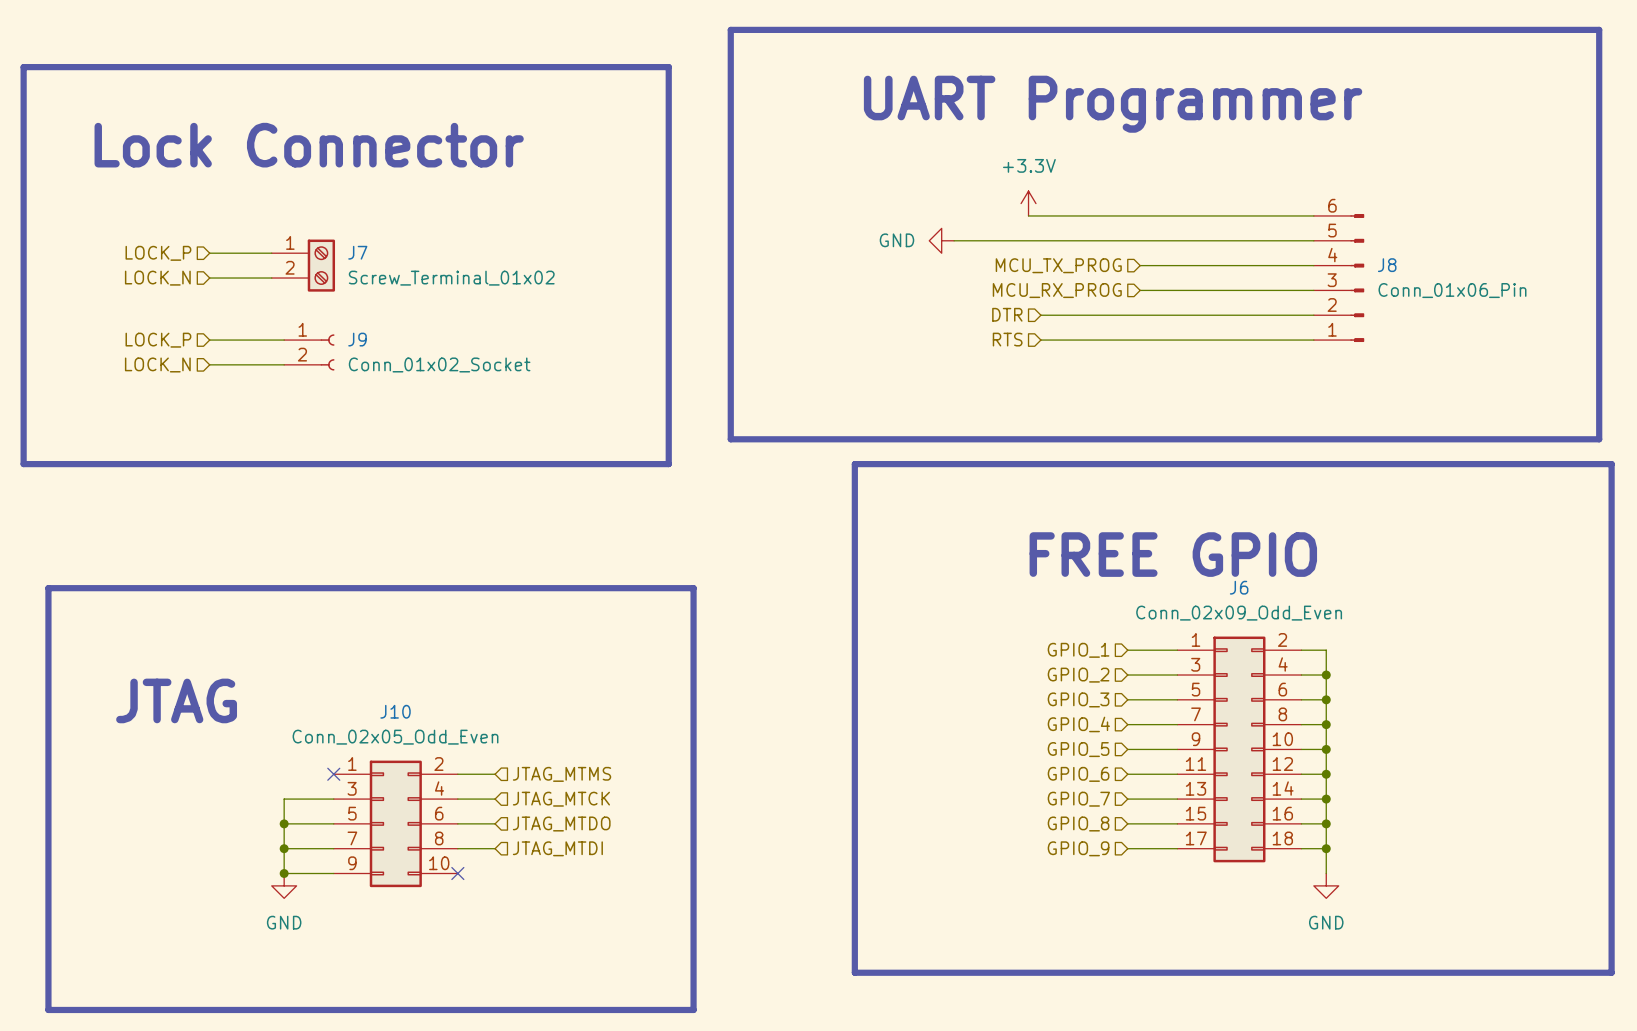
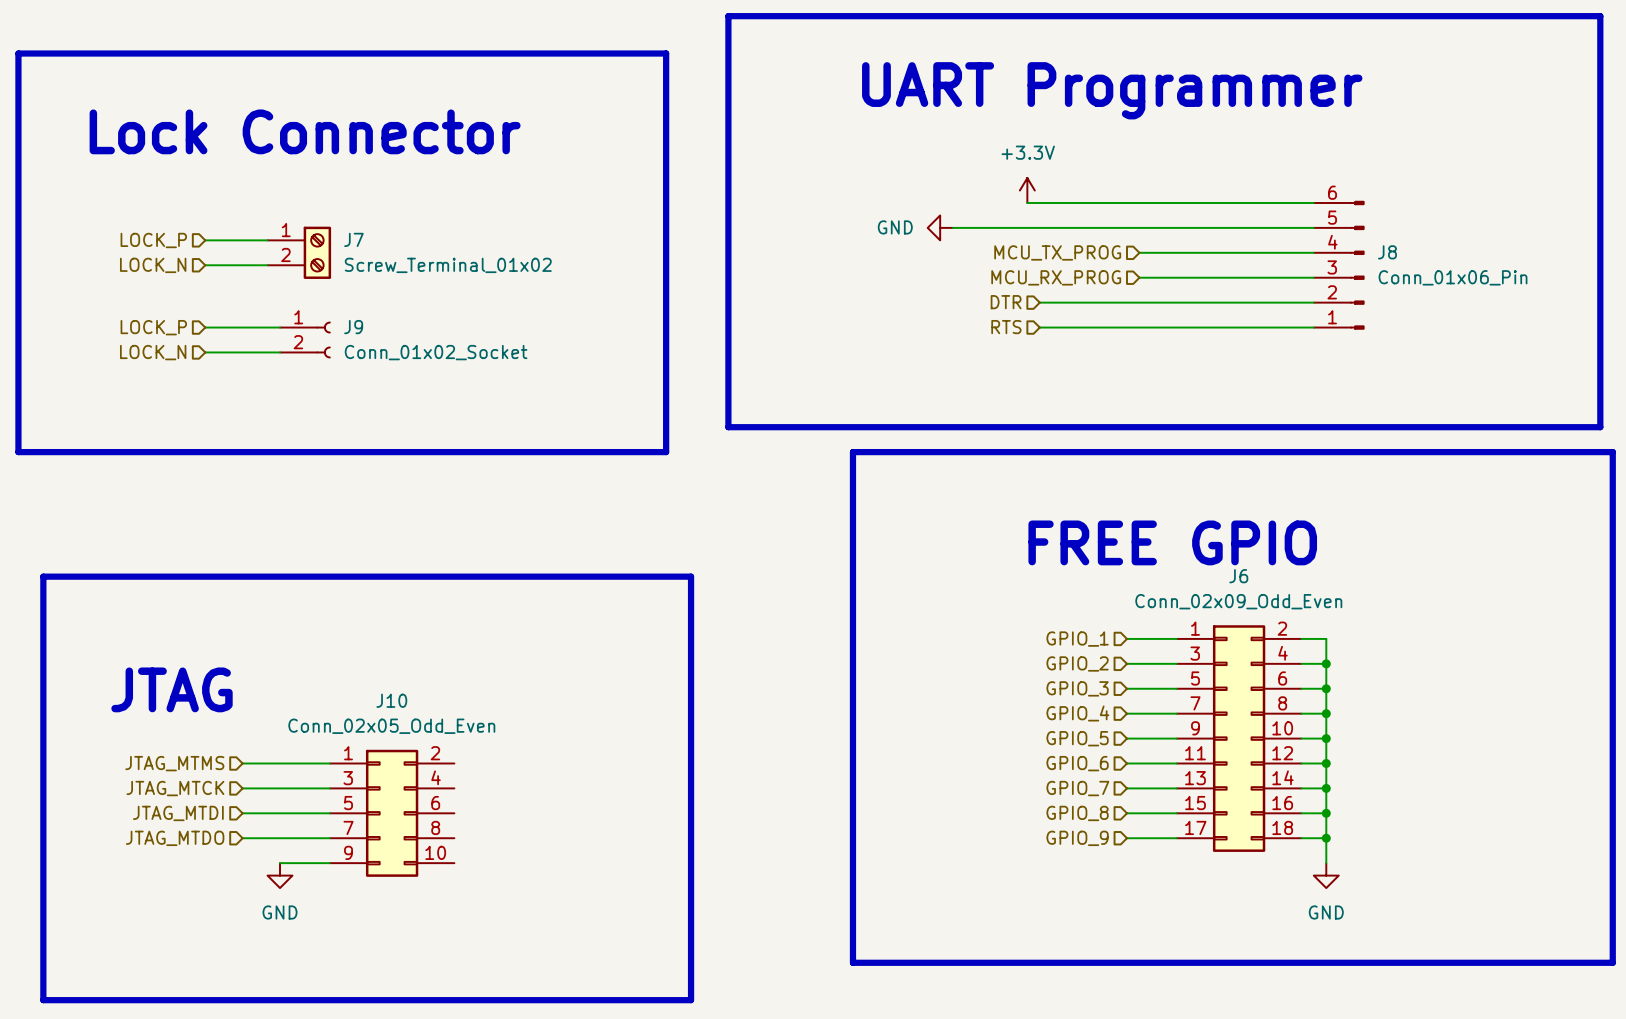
hierarchical label: none -> JTAG_MTMS (174, 763)
wire: none -> (242, 763) (329, 763)
no-connect mark: (333, 774) -> none
wire: (457, 774) (495, 774) -> none
hierarchical label: JTAG_MTMS (562, 774) -> none
hierarchical label: none -> JTAG_MTCK (175, 788)
wire: (284, 799) (284, 873) -> (280, 788) (242, 788)
wire: (457, 799) (495, 799) -> none
hierarchical label: JTAG_MTCK (561, 799) -> none
junction: (284, 823) -> none
wire: (457, 823) (495, 823) -> (242, 813) (280, 813)
hierarchical label: none -> JTAG_MTDI (178, 813)
hierarchical label: JTAG_MTDO (561, 824) -> none
hierarchical label: none -> JTAG_MTDO (175, 838)
junction: (284, 848) -> none
wire: (457, 848) (495, 848) -> (242, 838) (280, 838)
hierarchical label: JTAG_MTDI (557, 848) -> none
junction: (284, 873) -> none
no-connect mark: (457, 873) -> none

